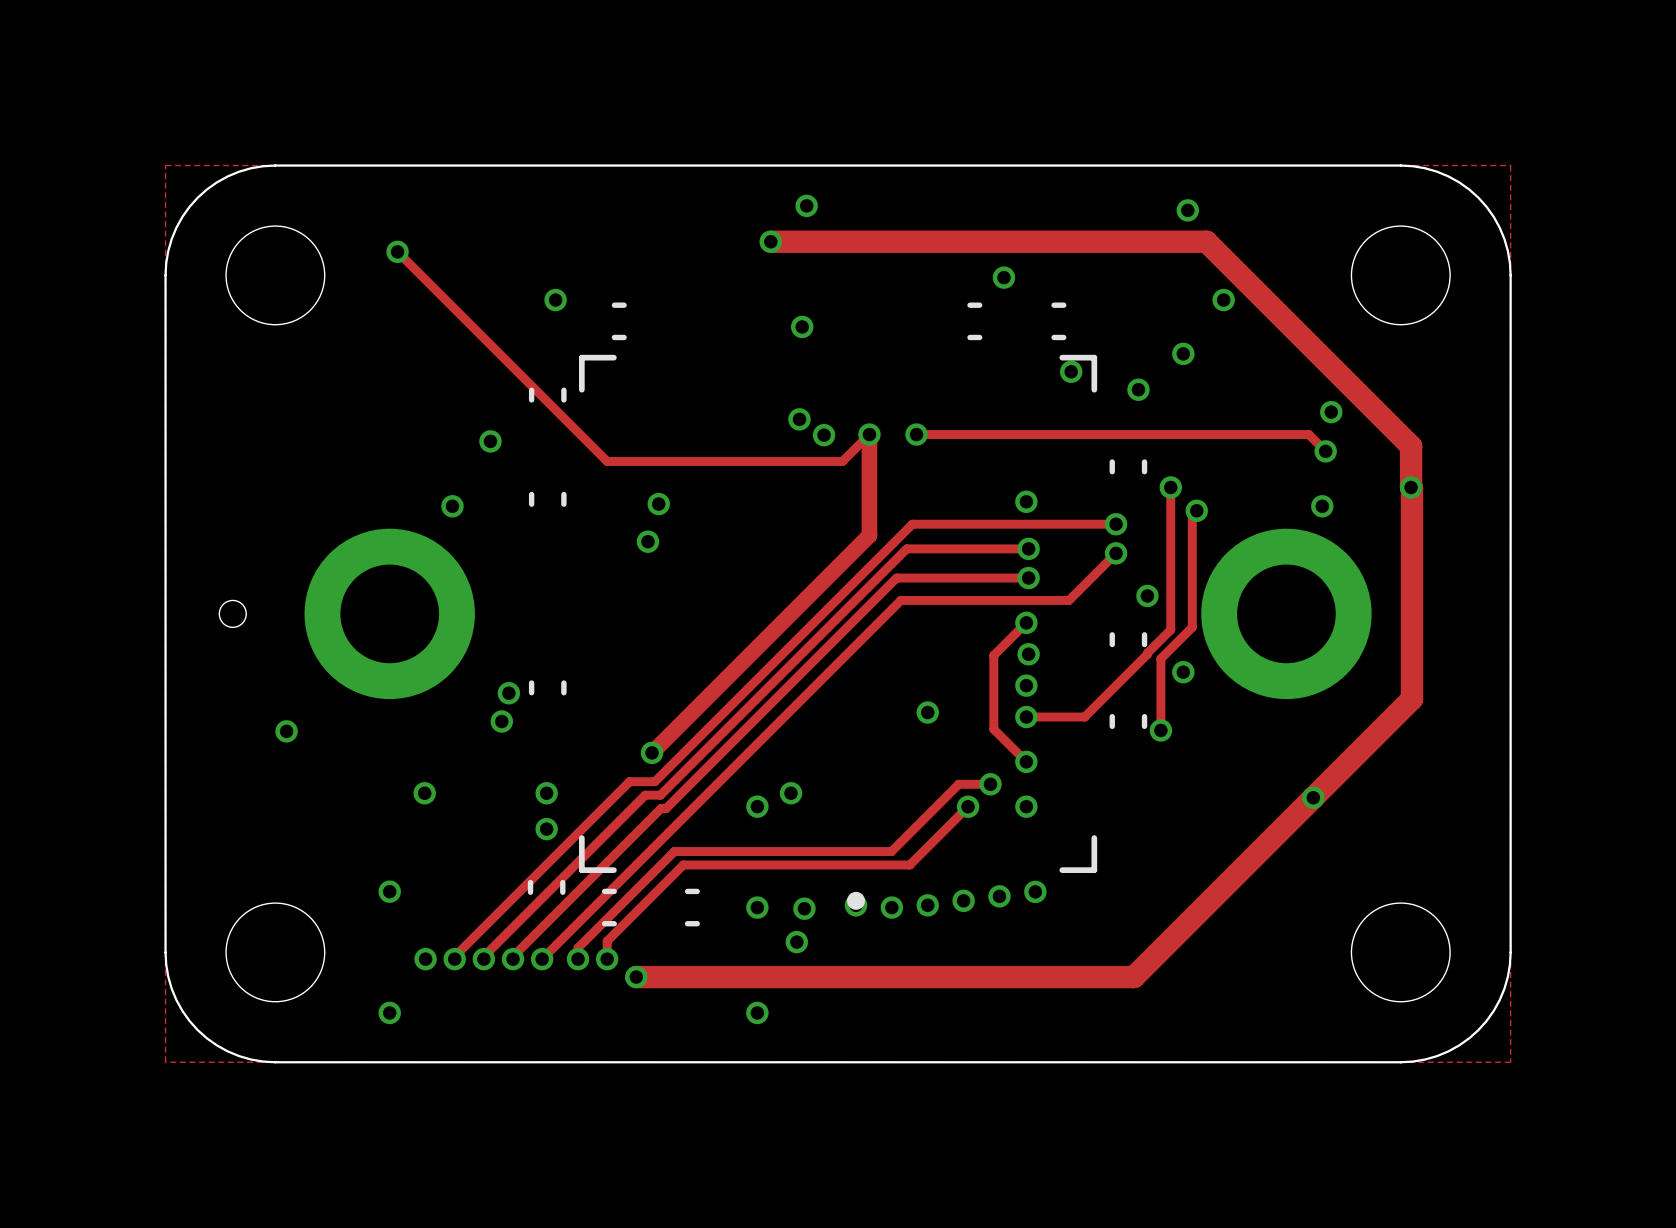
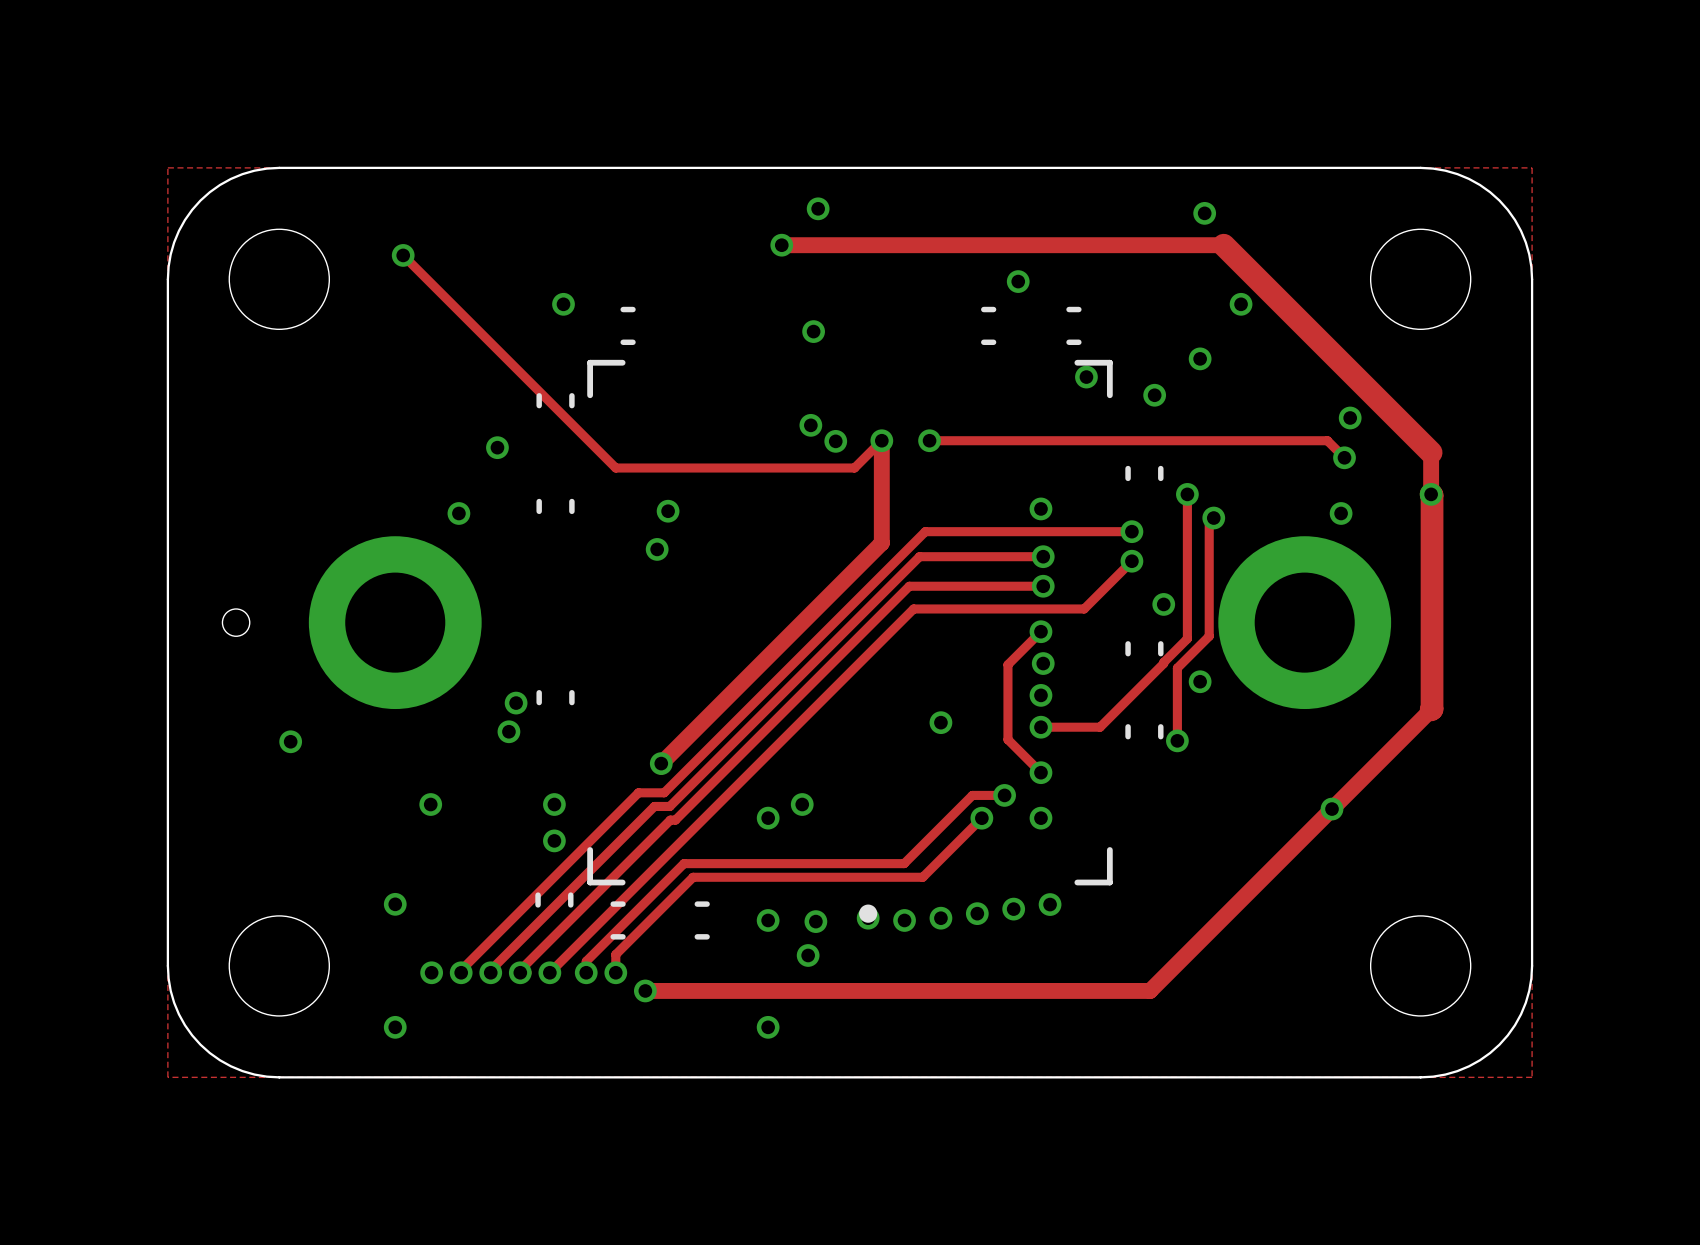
track width: thick (770, 241) (1206, 241) -> thin (781, 245) (1223, 245)
track width: thick (1411, 446) (1411, 487) -> thin (1431, 452) (1431, 494)
track width: thick (1411, 699) (1134, 977) (636, 977) -> thin (1431, 709) (1150, 990) (645, 990)

